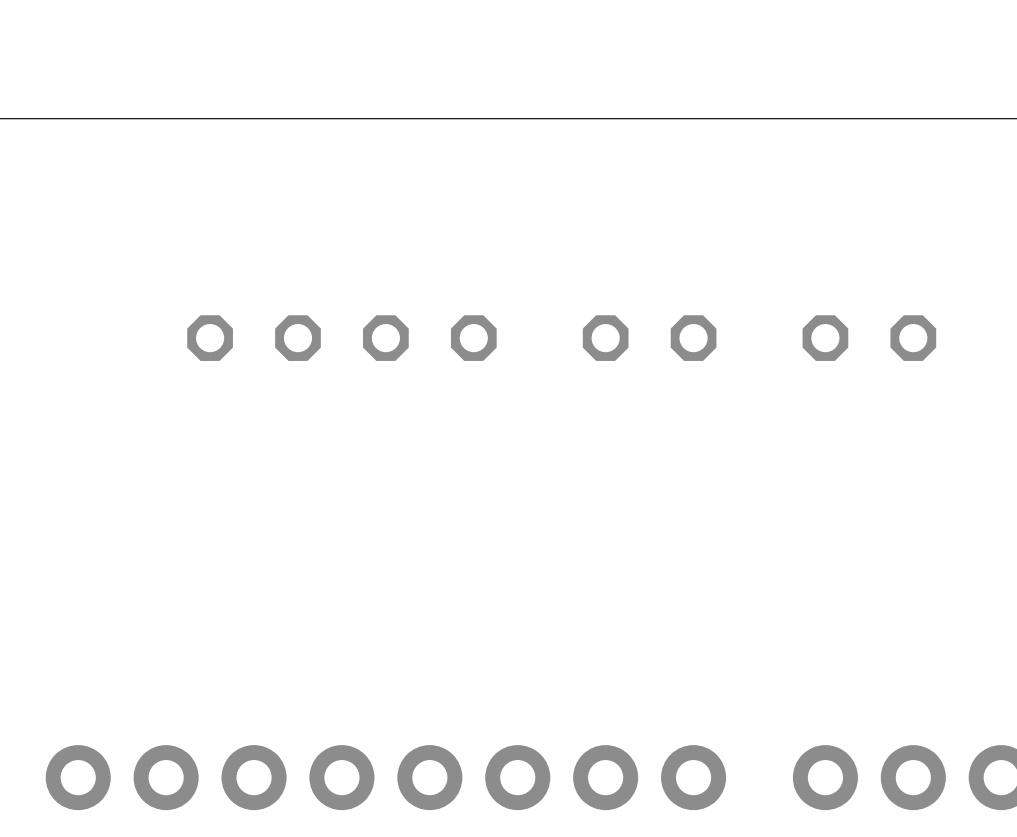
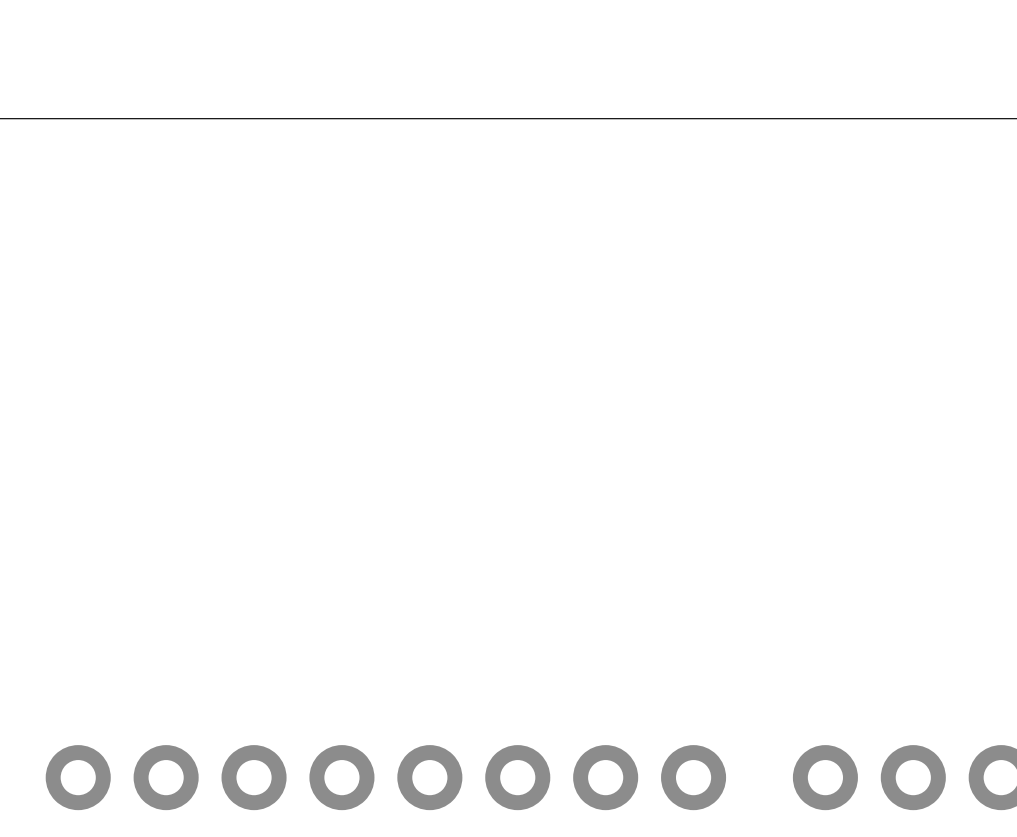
part: (254, 338) -> none
part: (429, 338) -> none
part: (649, 338) -> none
part: (869, 338) -> none

